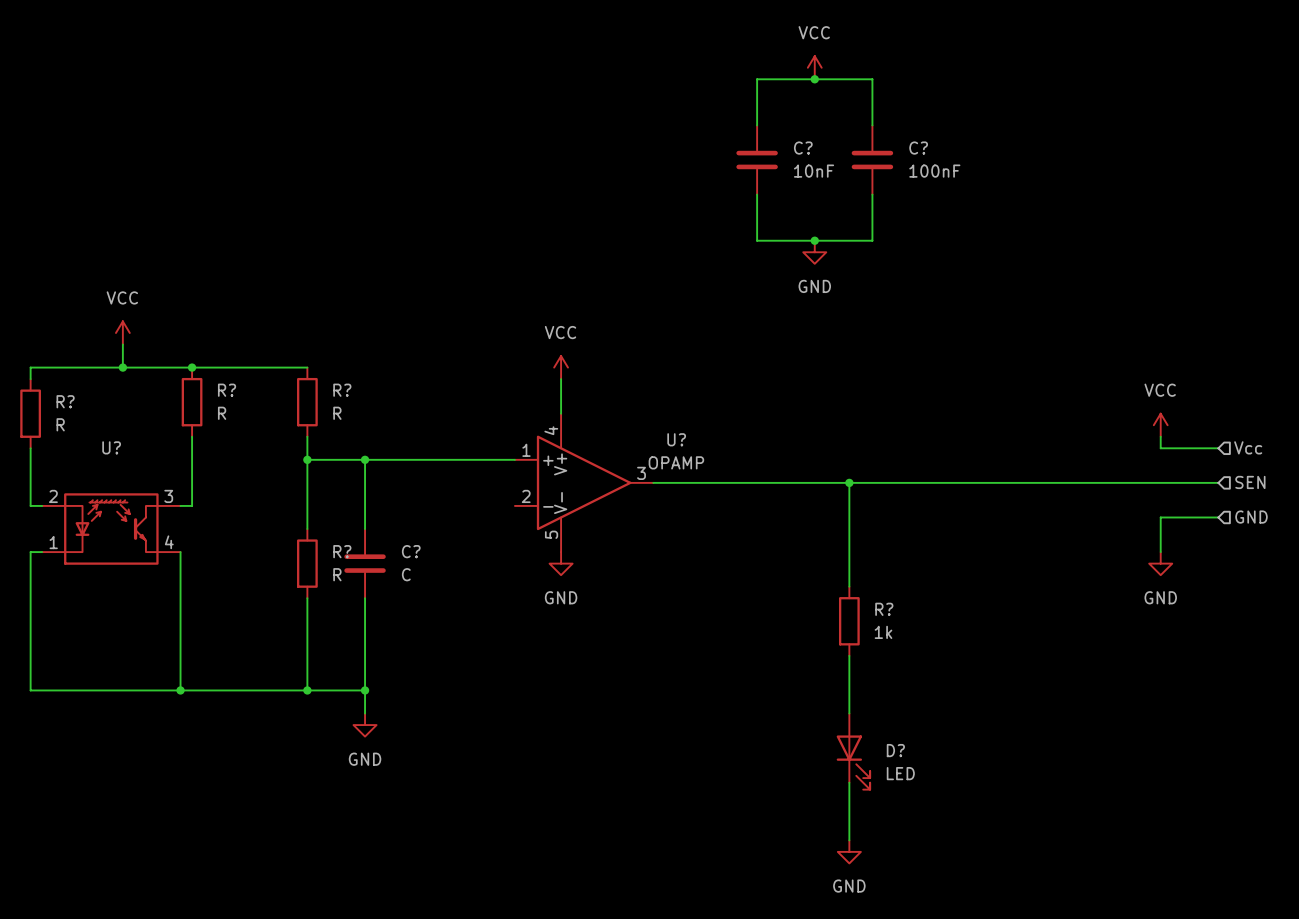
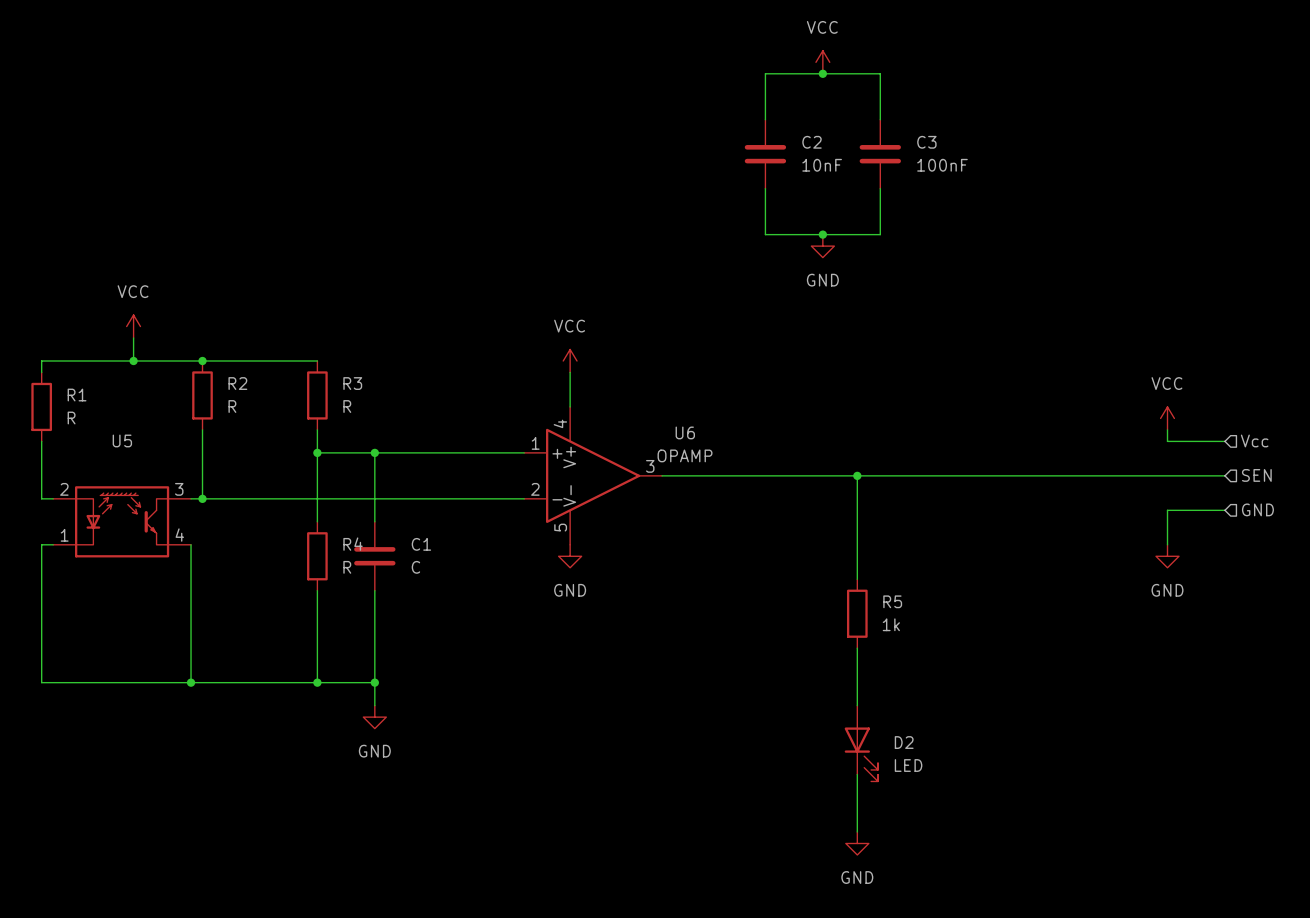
C? name: C? (803, 148) -> C2 (812, 142)
C? name: C? (918, 148) -> C3 (926, 142)
R? name: R? (227, 390) -> R2 (237, 383)
R? name: R? (342, 390) -> R3 (352, 383)
R? name: R? (65, 401) -> R1 (77, 395)
U? name: U? (676, 439) -> U6 (685, 432)
U? name: U? (111, 447) -> U5 (122, 440)
wire: none -> (202, 498) (524, 498)
junction: none -> (202, 498)
R? name: R? (342, 551) -> R4 (353, 544)
C? name: C? (411, 551) -> C1 (421, 544)
R? name: R? (884, 609) -> R5 (892, 601)
D? name: D? (895, 750) -> D2 (904, 742)

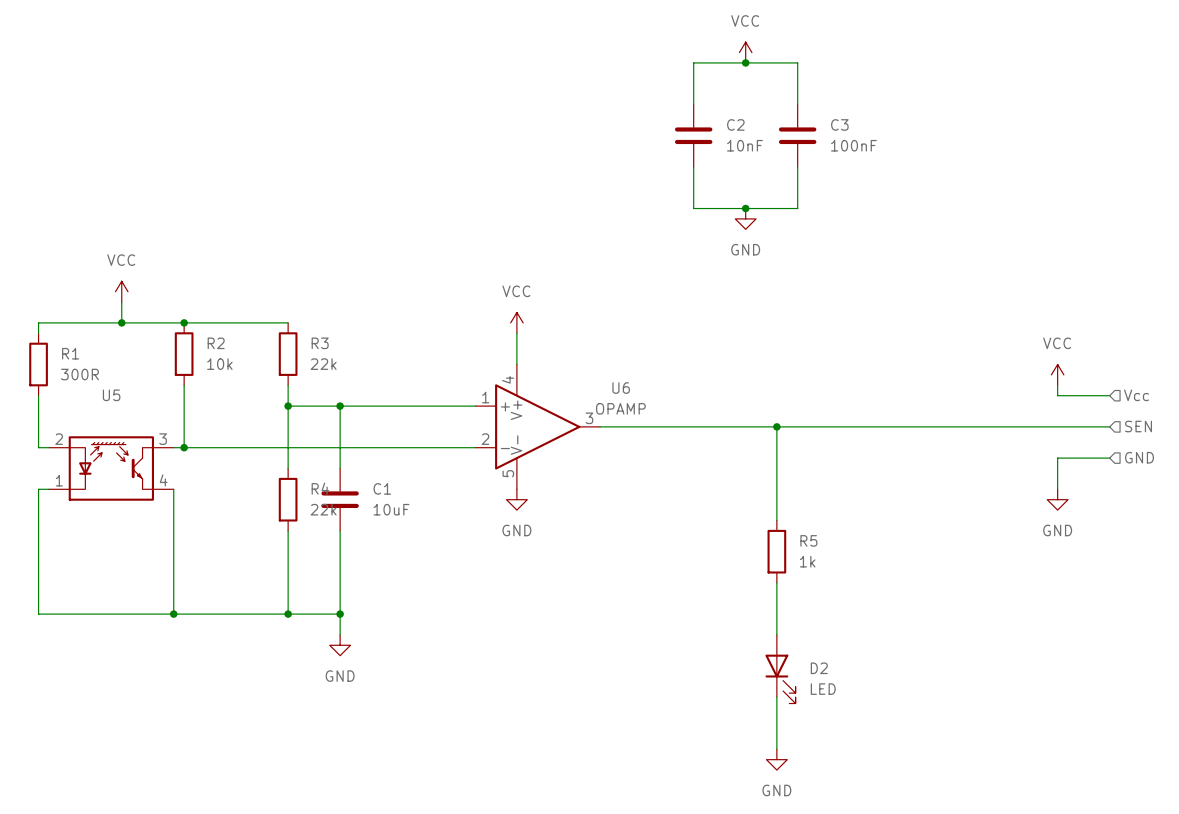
R2 value: R (232, 406) -> 10k (219, 364)
R3 value: R (347, 406) -> 22k (323, 364)
R1 value: R (71, 418) -> 300R (79, 374)
R4 value: R (347, 567) -> 22k (323, 509)
C1 value: C (415, 567) -> 10uF (391, 509)

